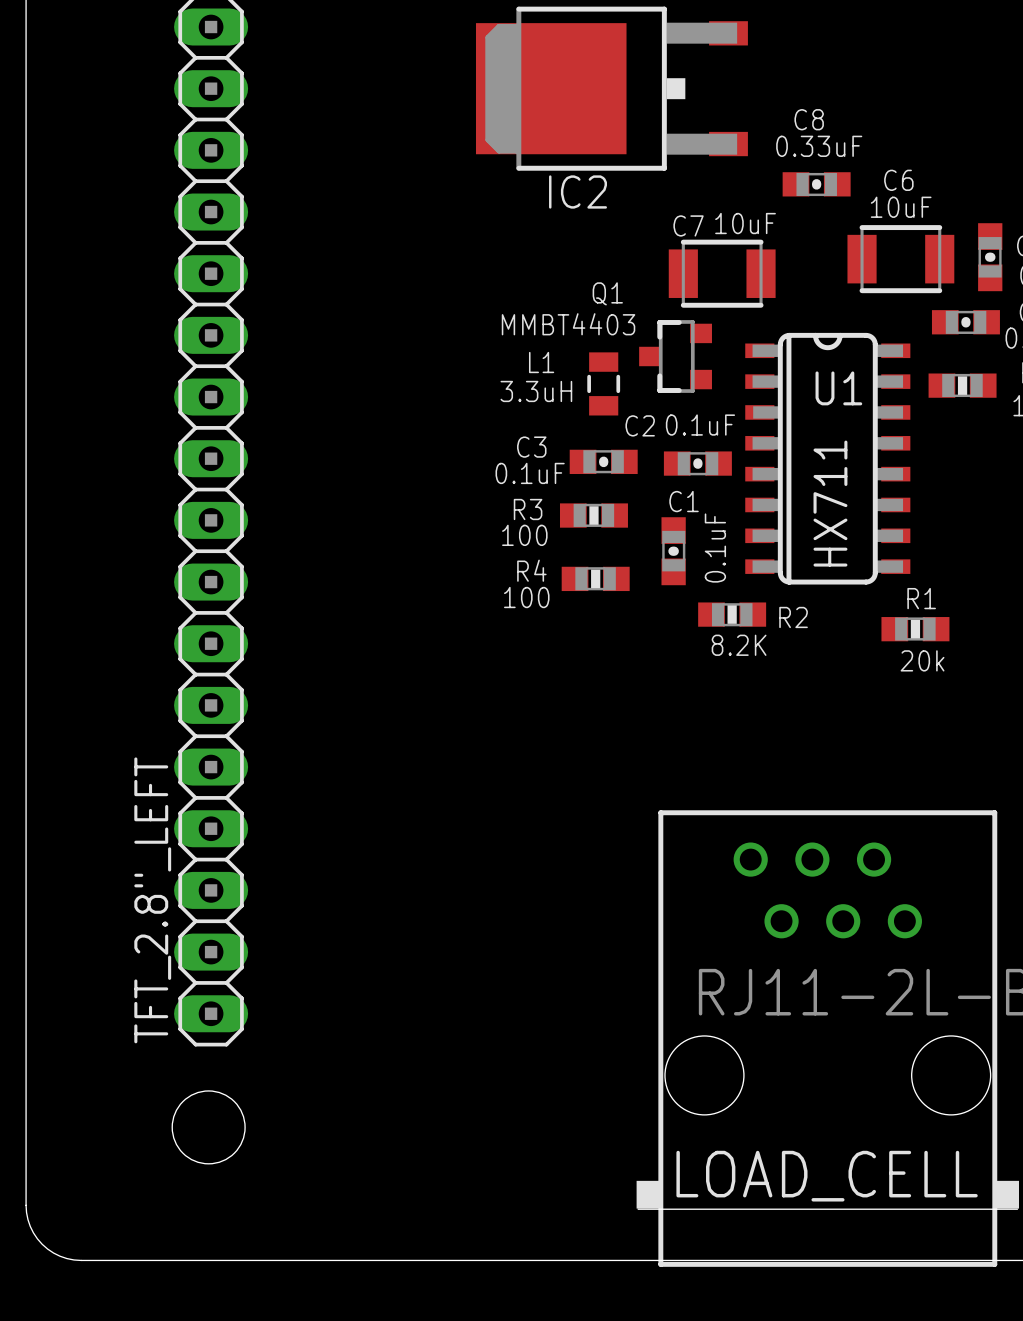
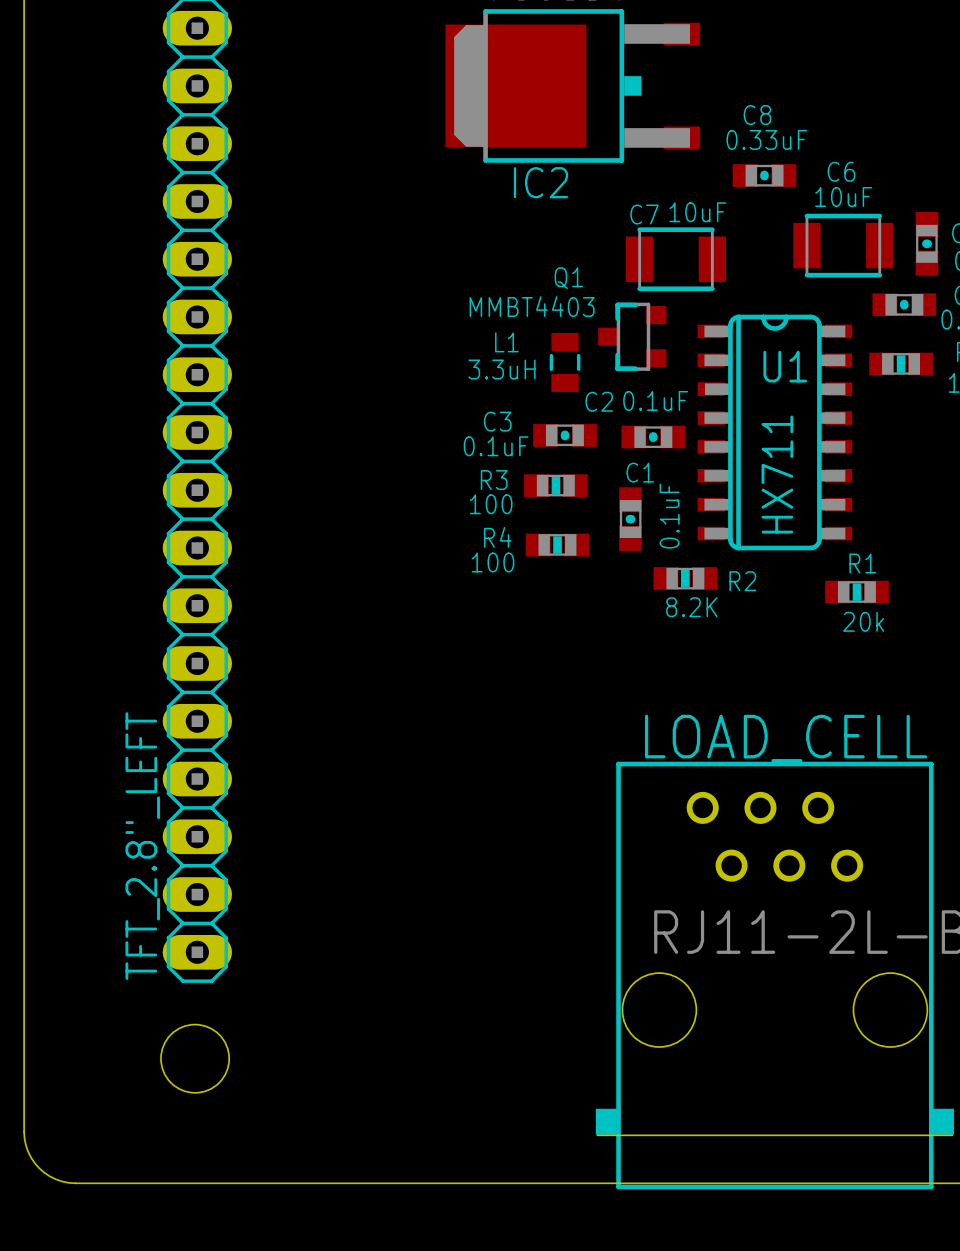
LOAD_CELL name position: LOAD_CELL (827, 1176) -> LOAD_CELL (786, 738)

